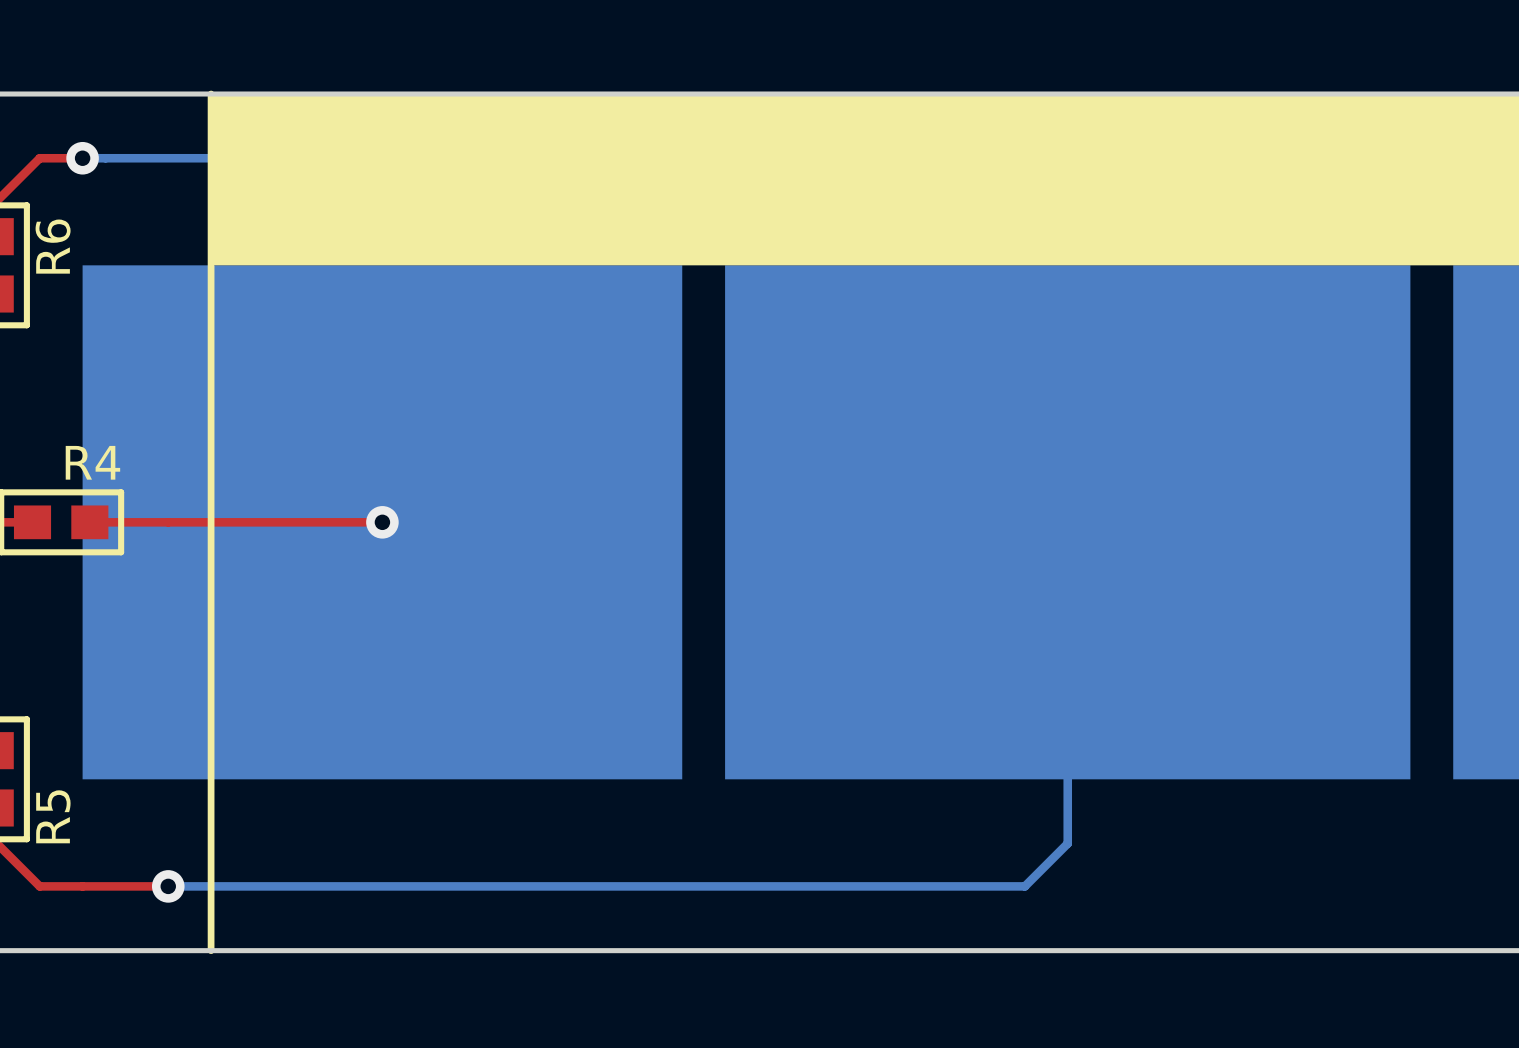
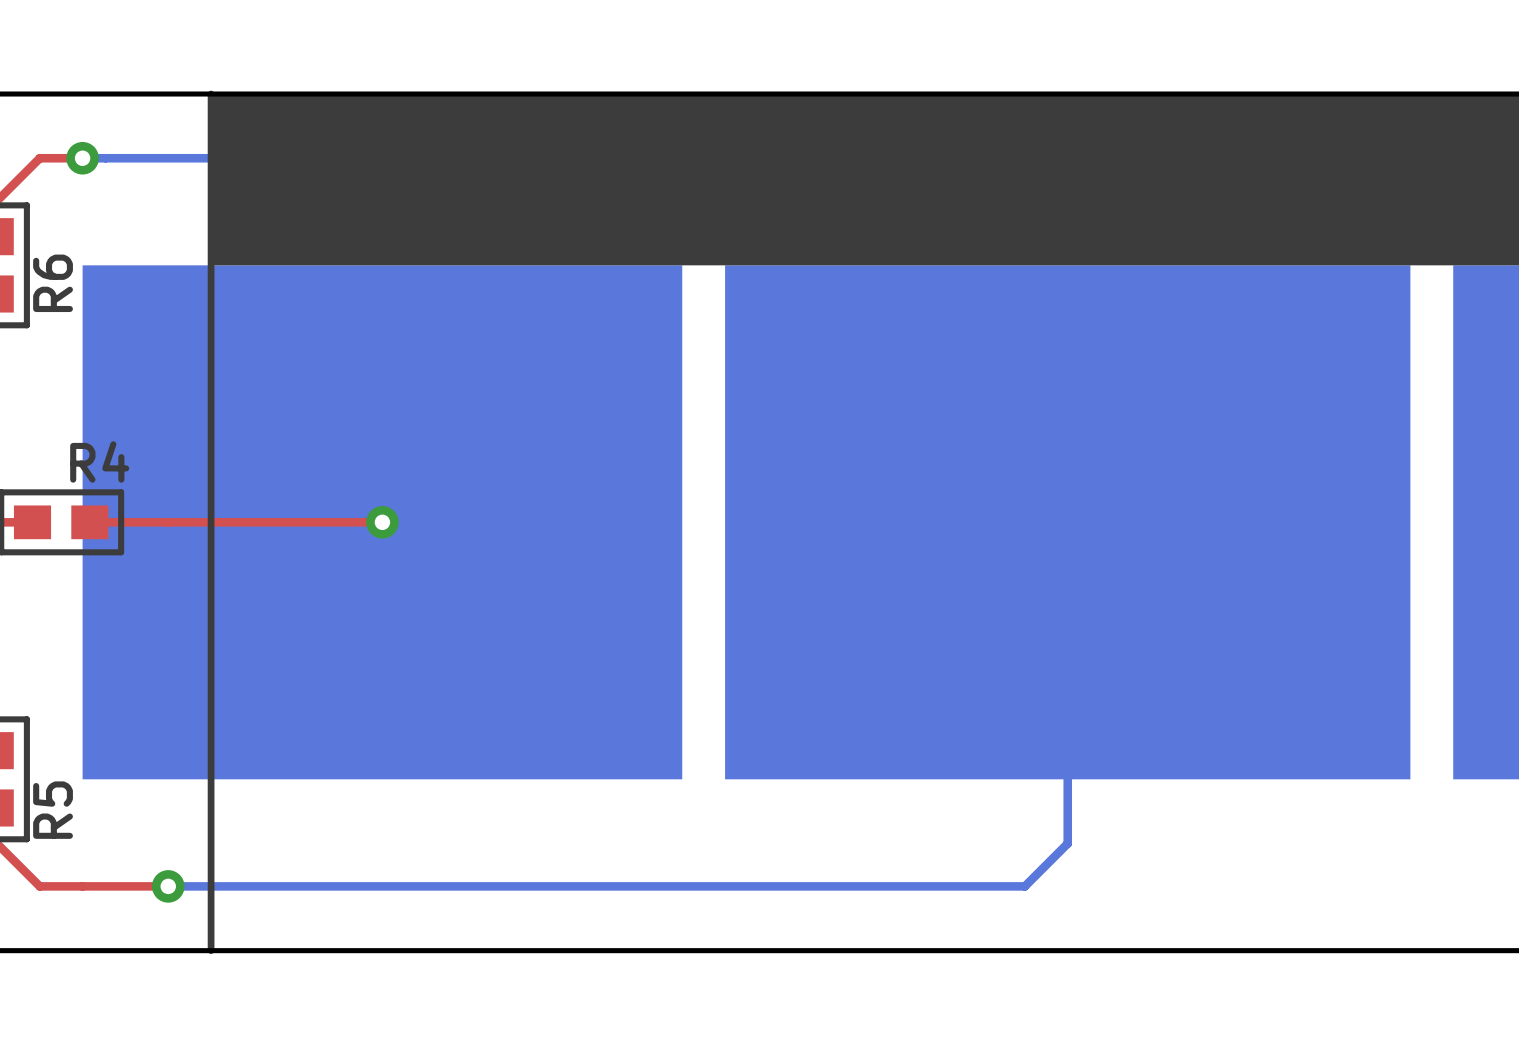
R6 name position: R6 (53, 246) -> R6 (53, 283)

